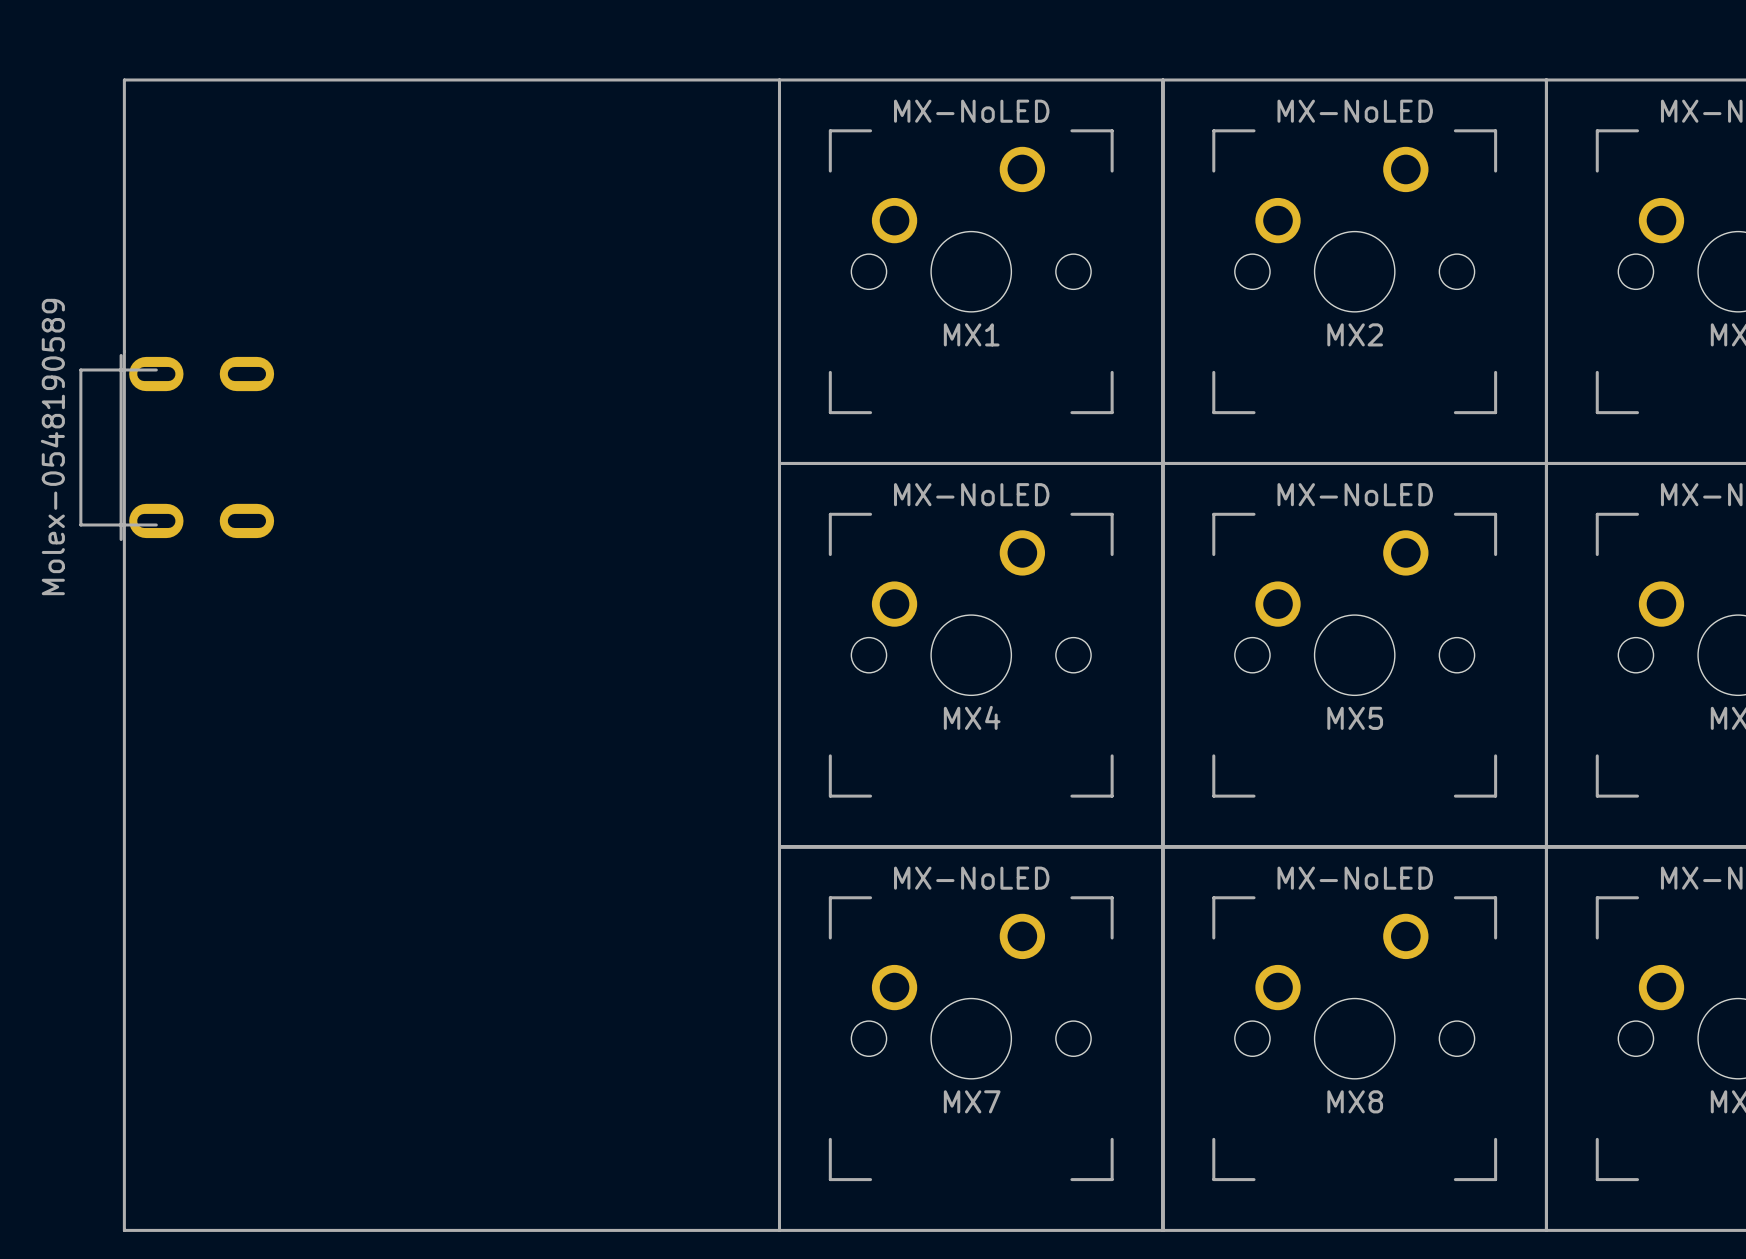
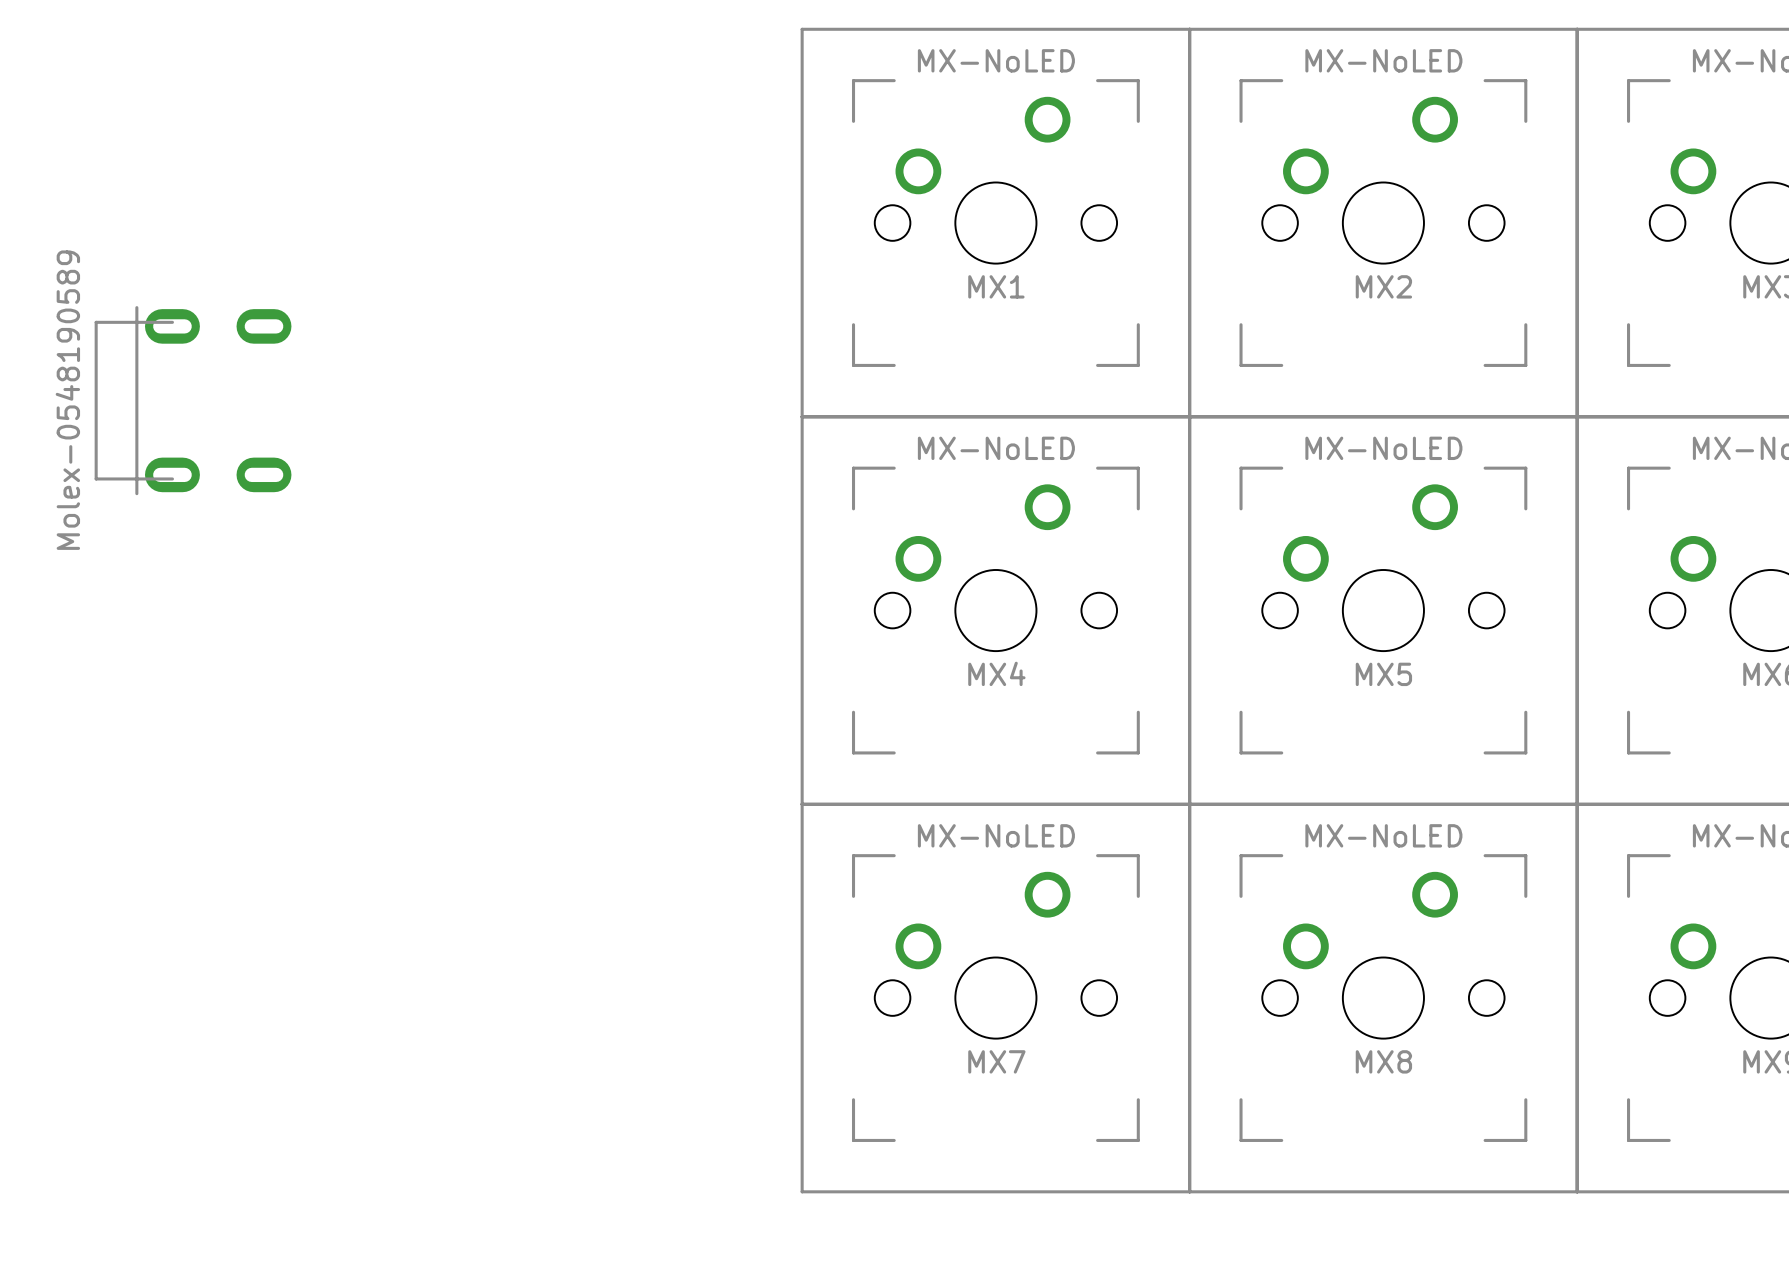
line: (779, 79) (124, 79) (124, 1230) (779, 1230) -> none

